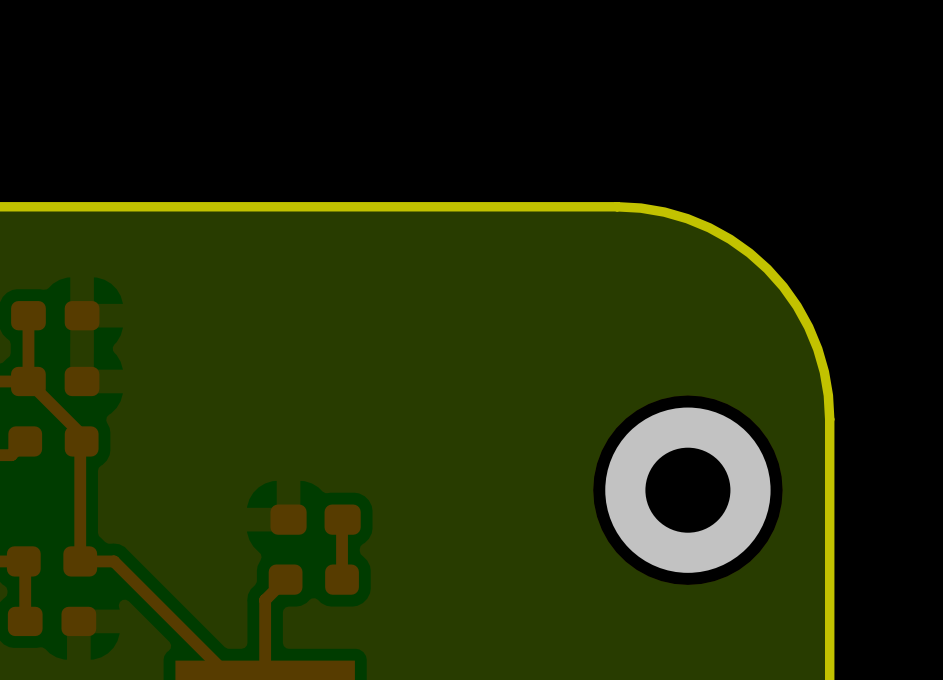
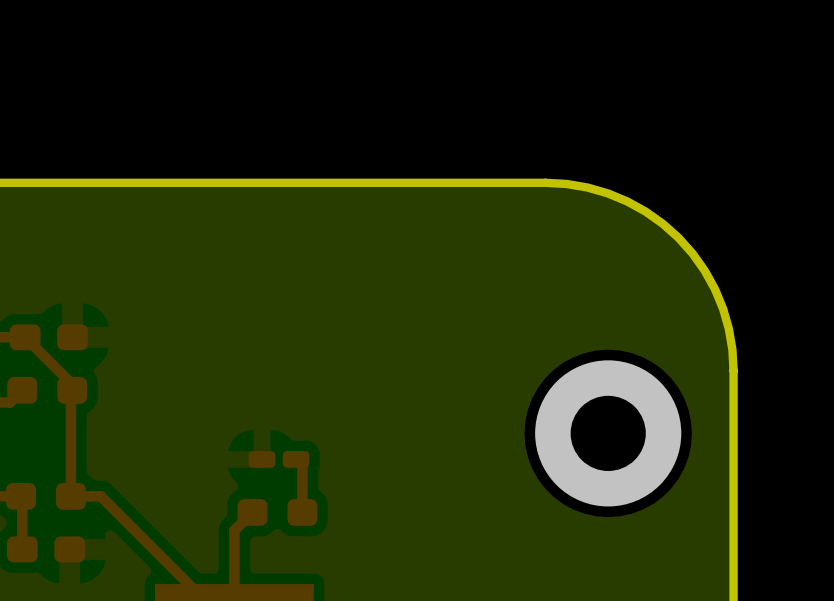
top track: (28, 315) (28, 381) -> none
part: (55, 315) -> none
part footprint: [270, 504, 361, 535] -> [248, 451, 310, 468]

